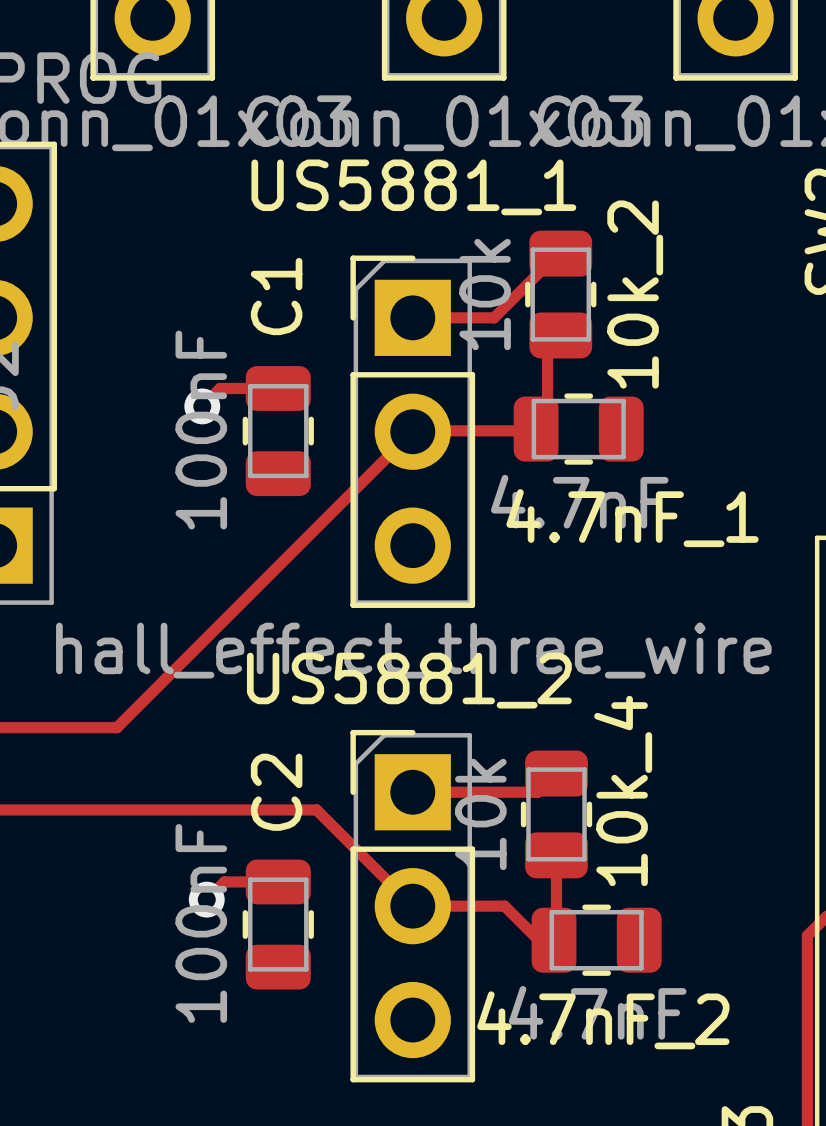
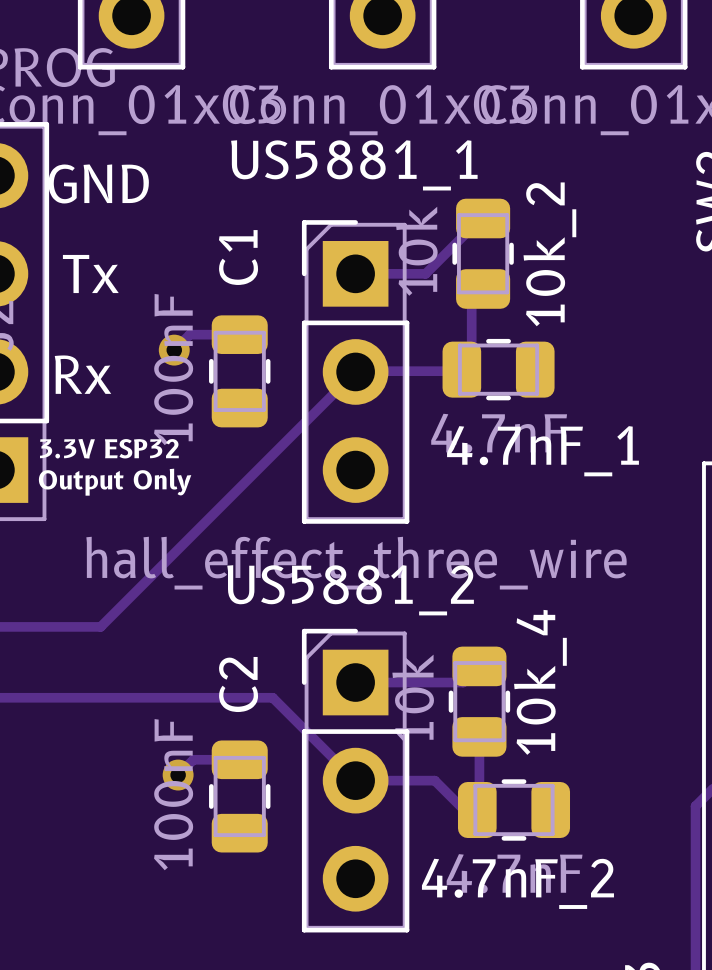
text: none -> GND (98, 183)
text: none -> Tx (90, 273)
text: none -> Rx (83, 374)
text: none -> 3.3V ESP32 (109, 448)
text: none -> Output Only (115, 482)

